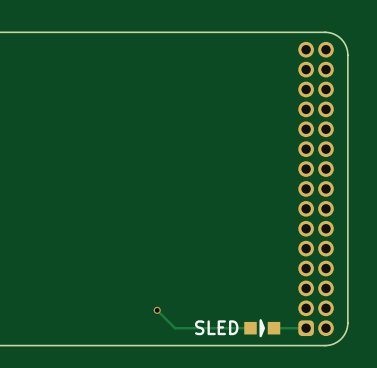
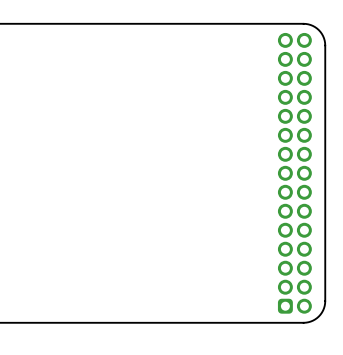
track: (157, 310) (175, 328) (250, 328) -> none
via: (157, 310) -> none
part: SLED (262, 328) -> none
track: (273, 328) (306, 328) -> none

